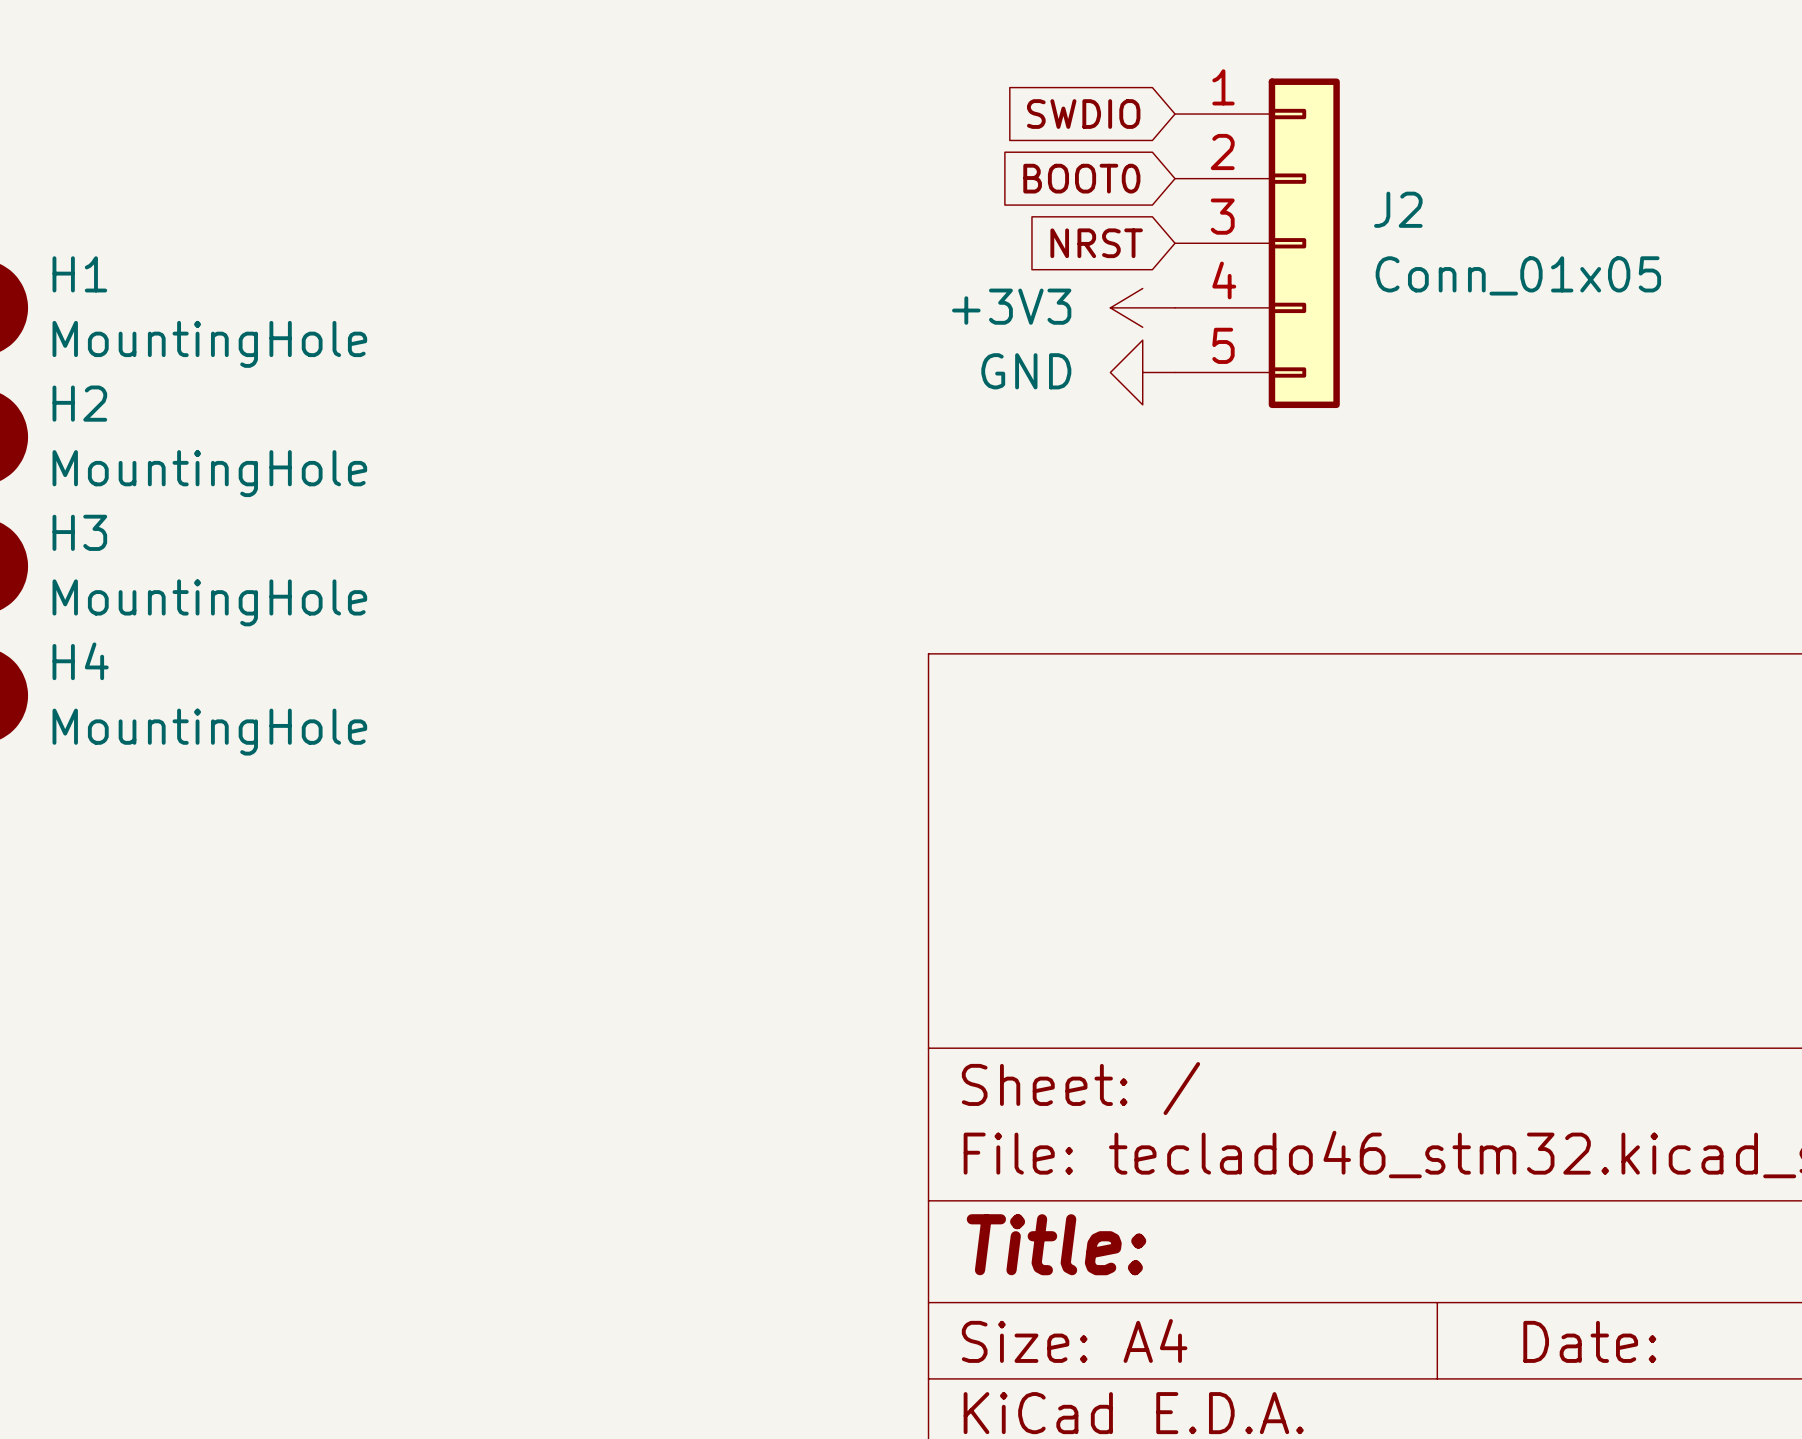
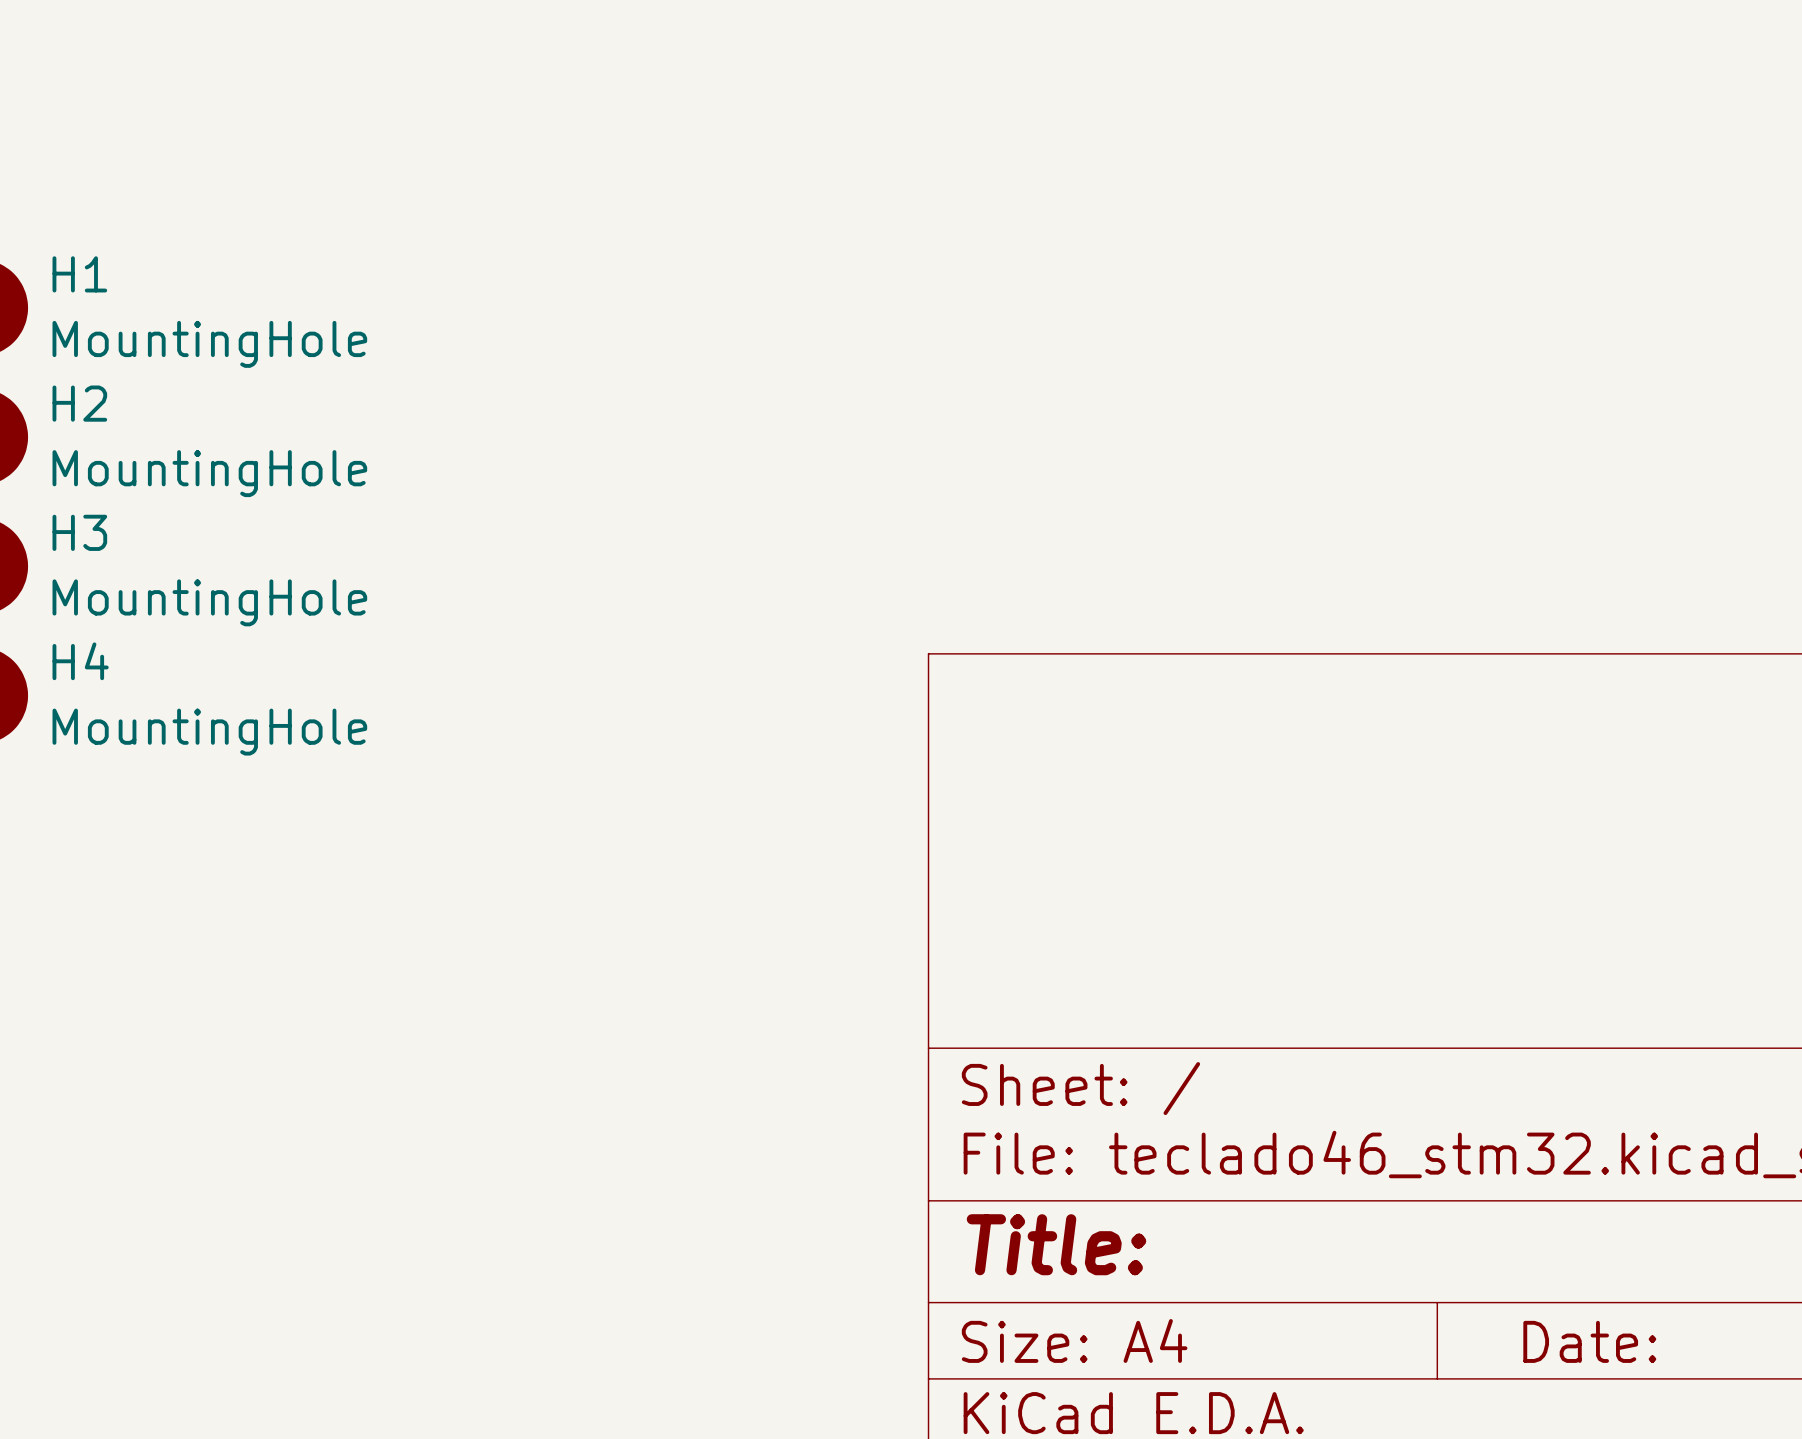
global label: SWDIO (1083, 114) -> none
global label: BOOT0 (1081, 178) -> none
global label: NRST (1096, 243) -> none
J2: Conn_01x05 (1257, 243) -> none
power symbol: +3V3 (1142, 307) -> none
power symbol: GND (1142, 372) -> none

